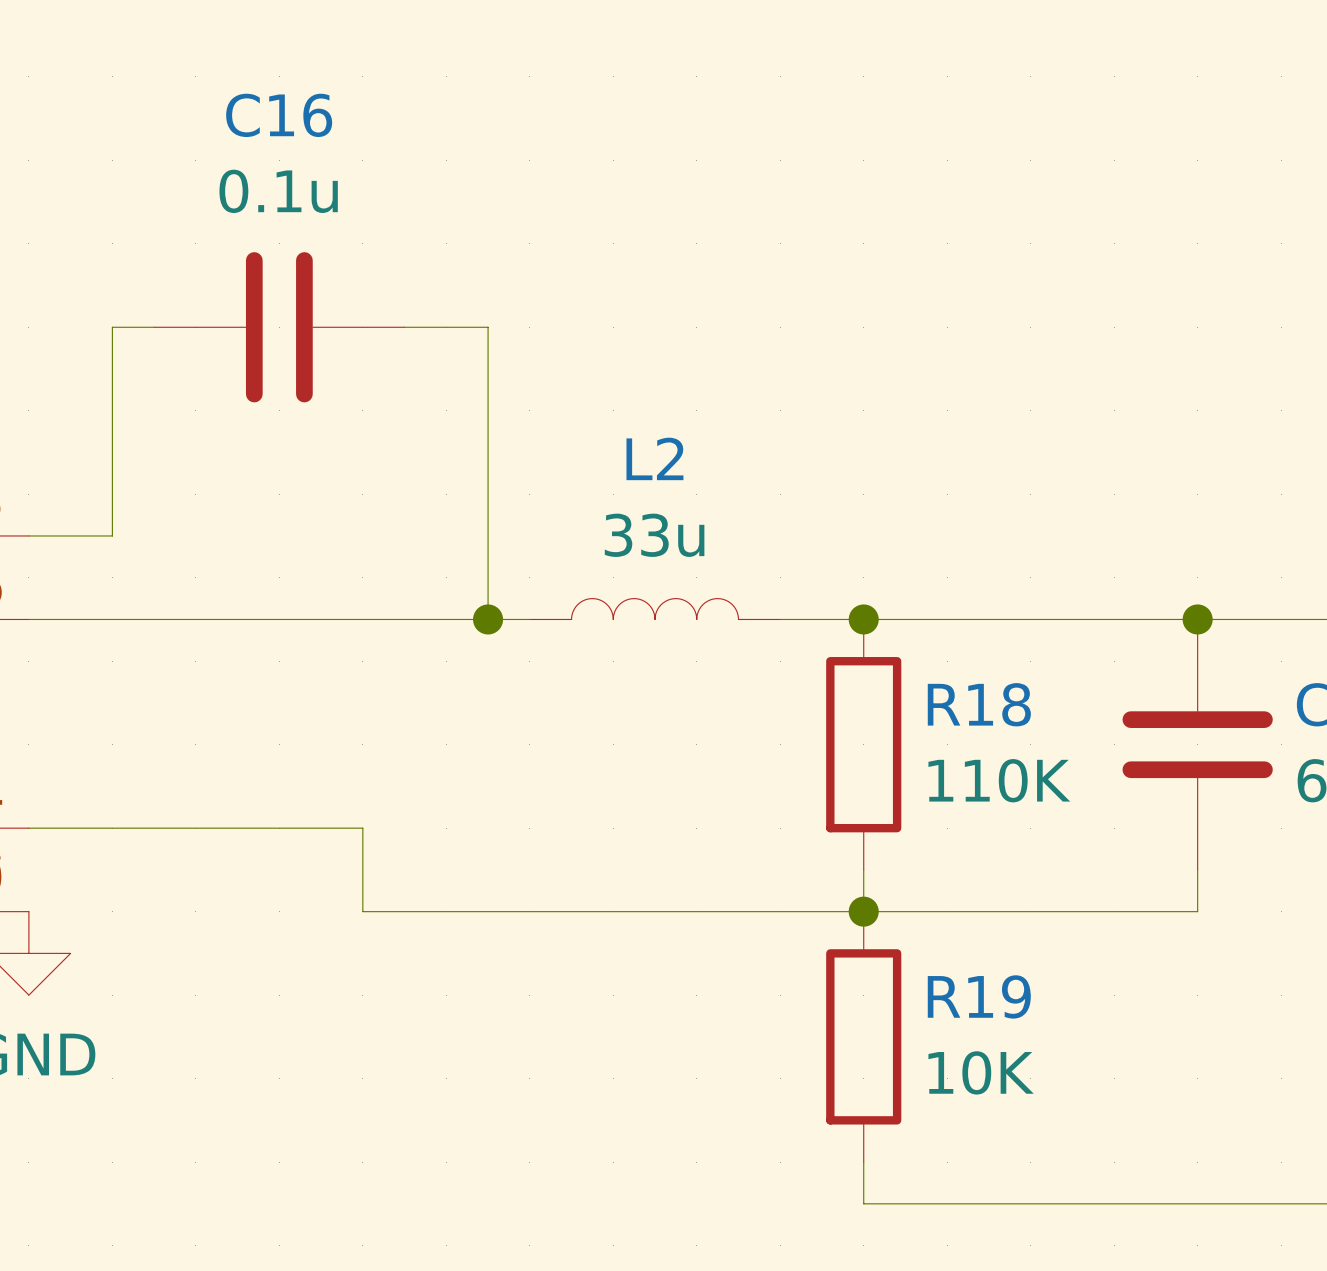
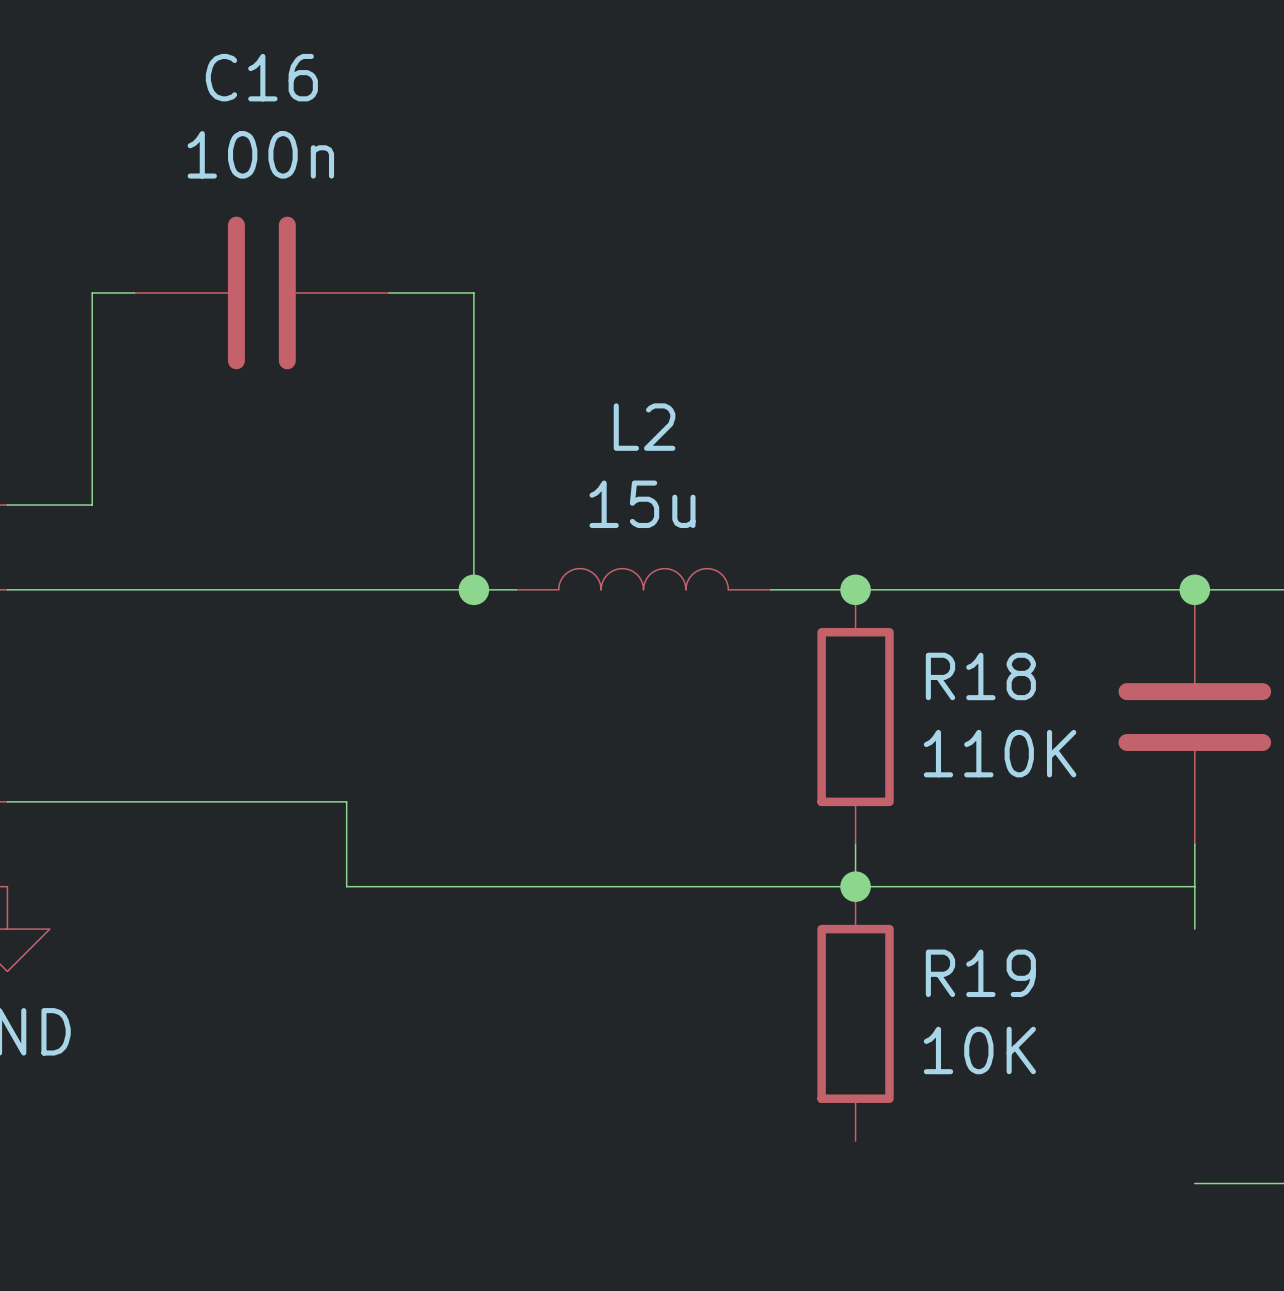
C16 value: 0.1u (278, 191) -> 100n (260, 154)
L2 value: 33u (654, 535) -> 15u (642, 504)
wire: none -> (1194, 886) (1194, 929)
wire: (863, 1162) (863, 1203) (1197, 1203) -> none

